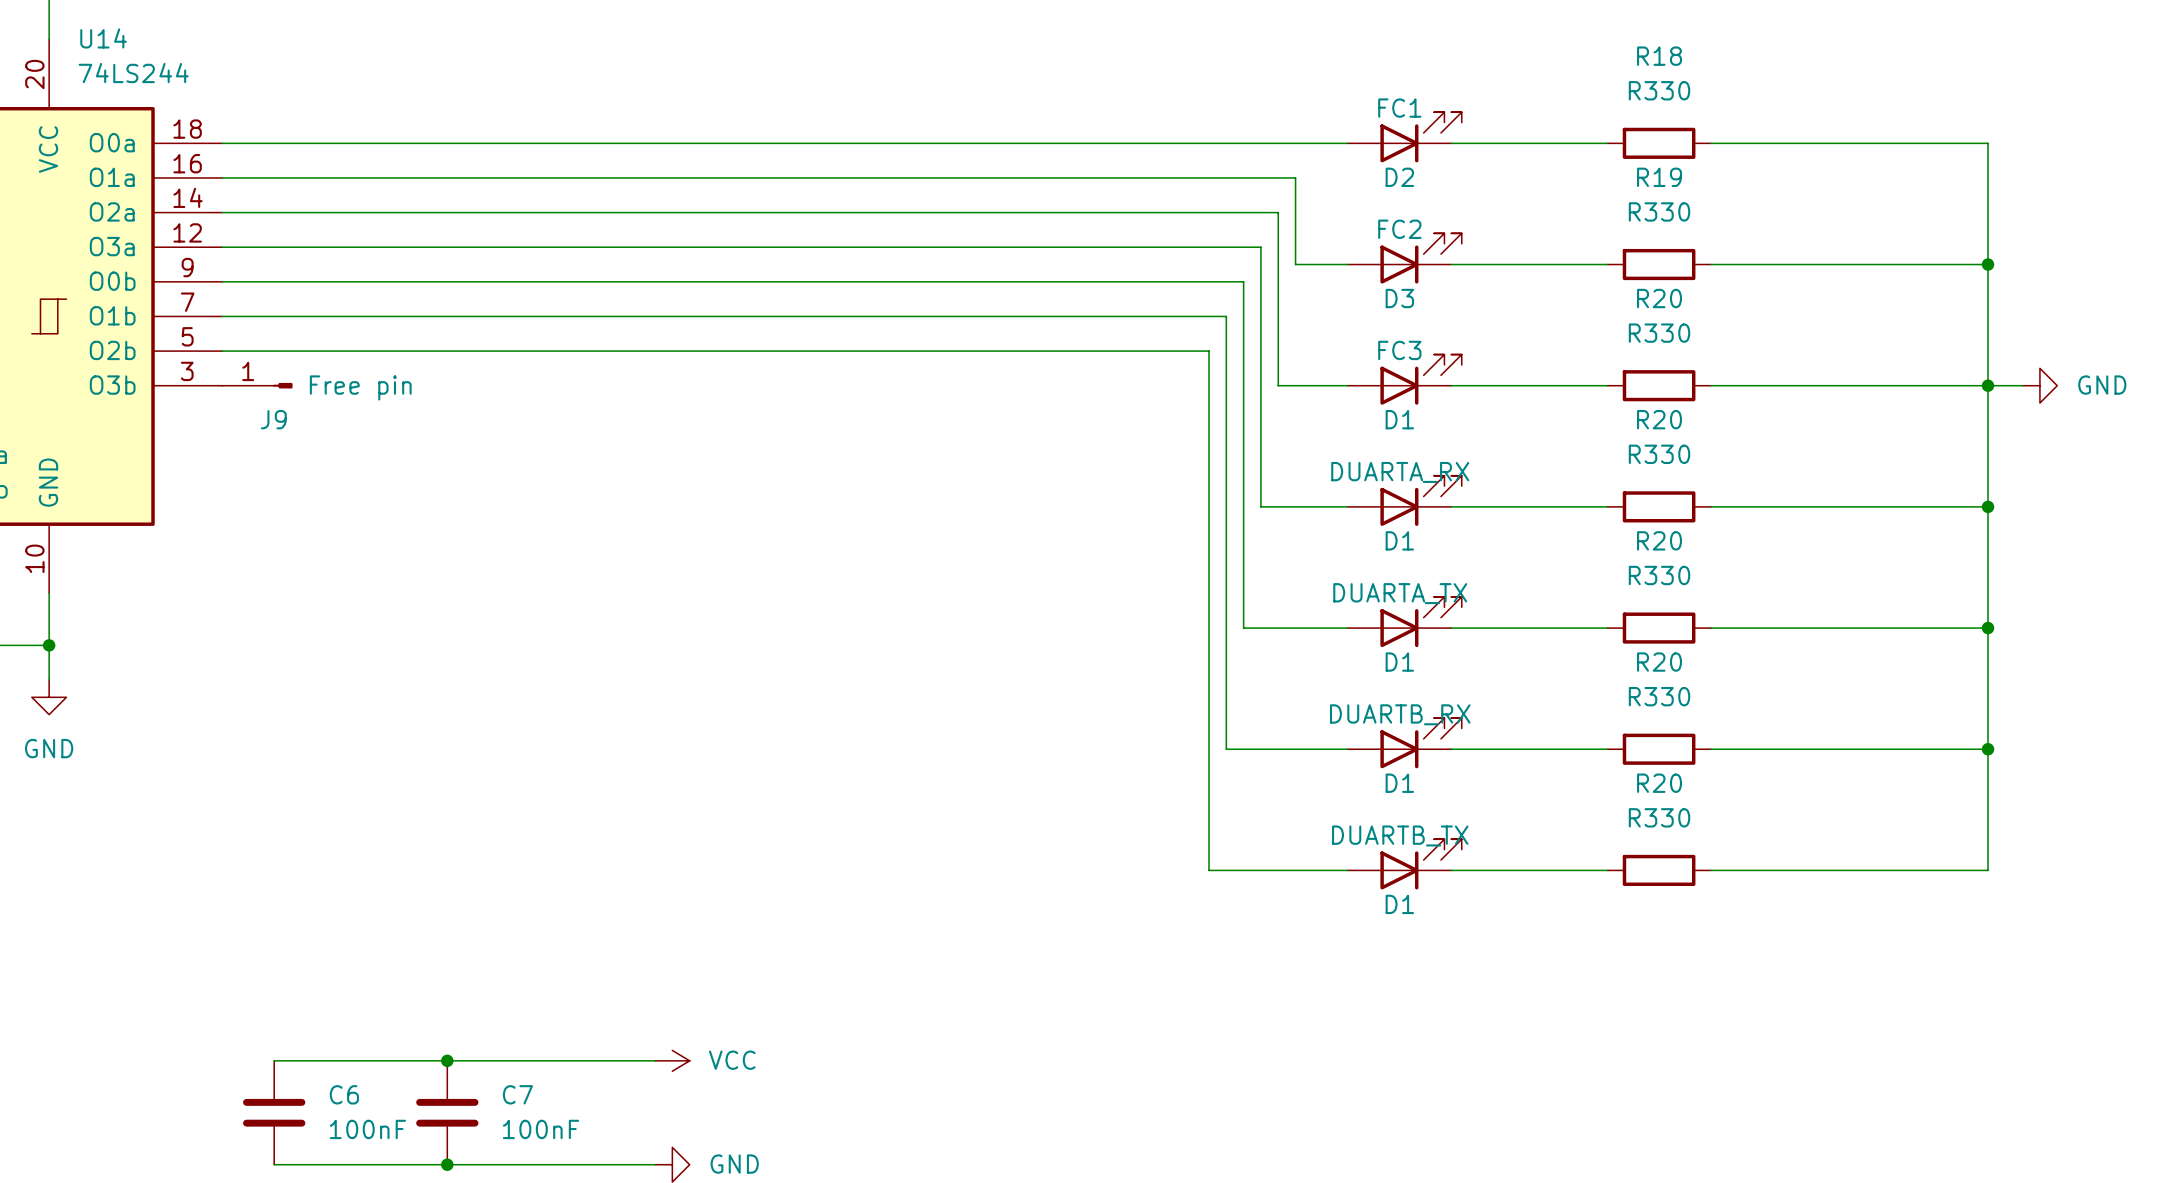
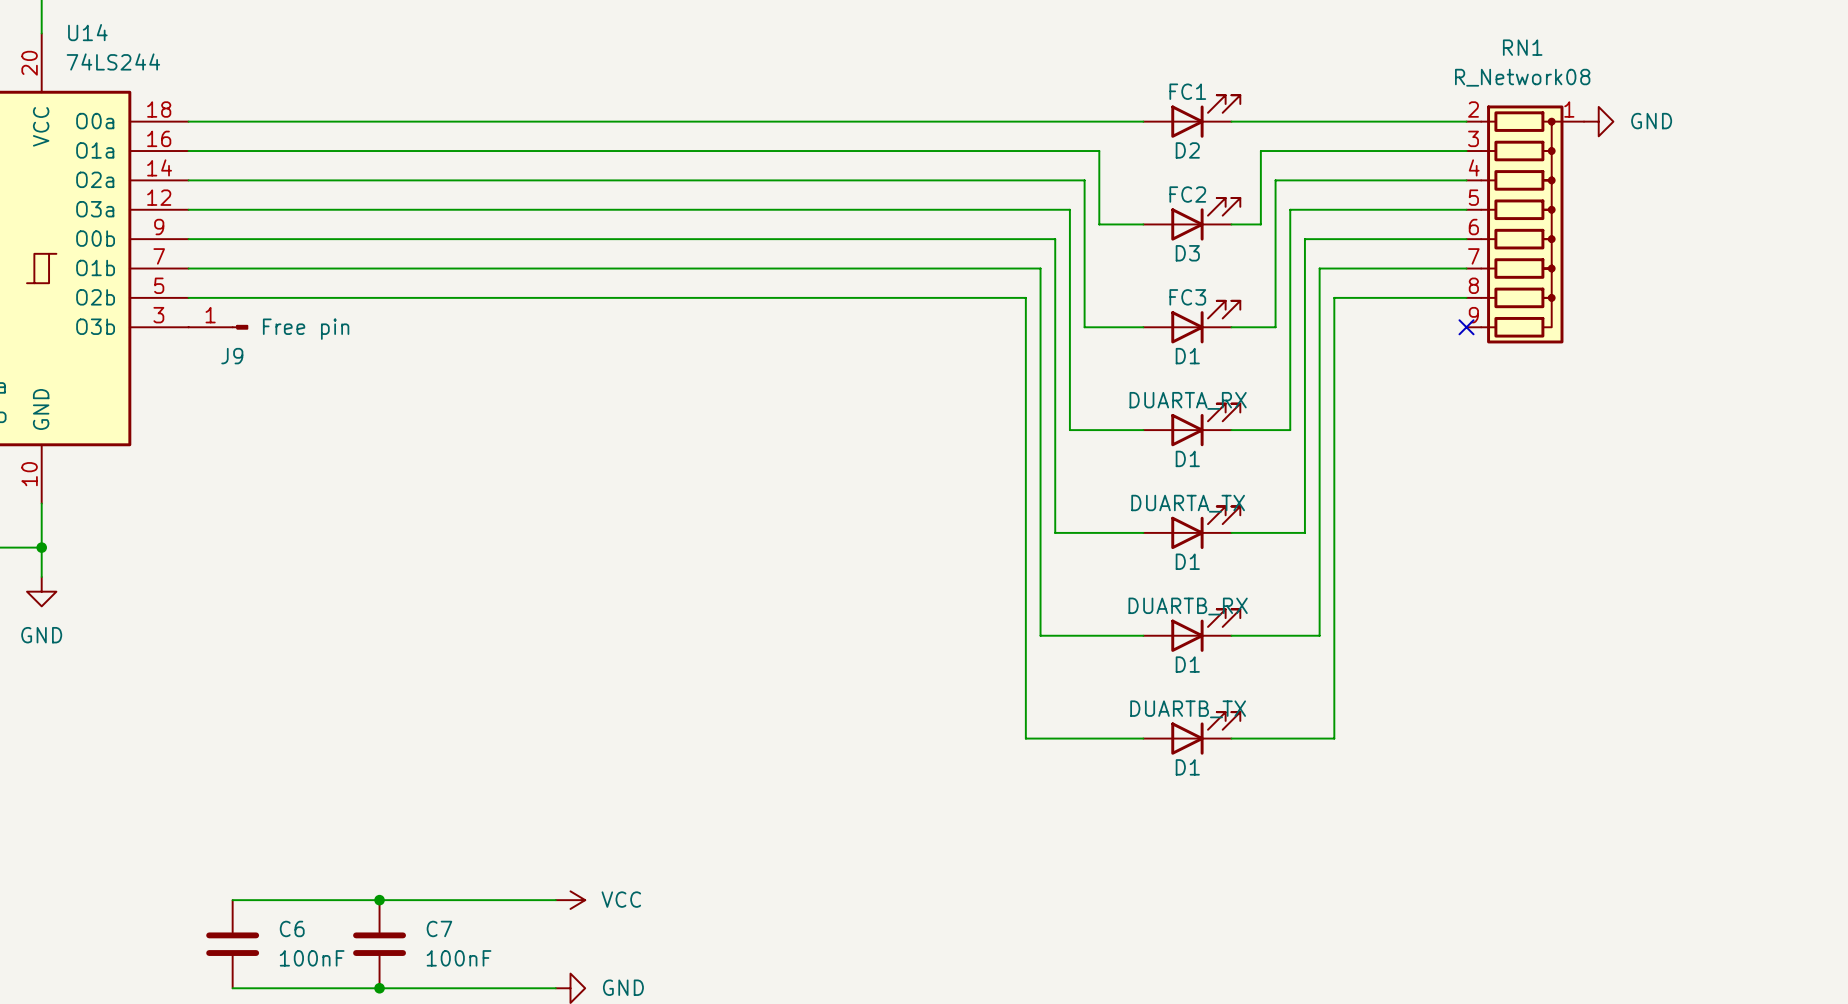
wire: none -> (1363, 121) (1451, 121)
R18: R330 (1659, 143) -> none
wire: (1728, 143) (1988, 143) (1988, 870) (1711, 870) -> none
wire: (1485, 264) (1607, 264) -> (1260, 224) (1260, 151) (1466, 151)
R19: R330 (1659, 264) -> none
wire: (1711, 264) (1988, 264) -> none
RN1: none -> R_Network08 (1525, 224)
junction: (1988, 264) -> none
wire: (1503, 385) (1607, 385) -> (1275, 327) (1275, 180) (1466, 180)
R20: R330 (1659, 385) -> none
wire: (1711, 385) (2022, 385) -> none
no-connect mark: none -> (1466, 327)
junction: (1988, 385) -> none
power symbol position: GND (2039, 385) -> GND (1598, 121)
wire: (1520, 506) (1607, 506) -> (1290, 430) (1290, 209) (1466, 209)
R20: R330 (1659, 506) -> none
wire: (1711, 506) (1988, 506) -> none
junction: (1988, 506) -> none
wire: (1537, 628) (1607, 628) -> (1304, 532) (1304, 239) (1466, 239)
R20: R330 (1659, 628) -> none
wire: (1711, 628) (1988, 628) -> none
junction: (1988, 628) -> none
wire: (1555, 749) (1607, 749) -> (1319, 635) (1319, 268) (1466, 268)
R20: R330 (1659, 749) -> none
wire: (1711, 749) (1988, 749) -> none
junction: (1988, 749) -> none
wire: (1572, 870) (1607, 870) -> (1334, 738) (1334, 297) (1466, 297)
R20: R330 (1659, 870) -> none

